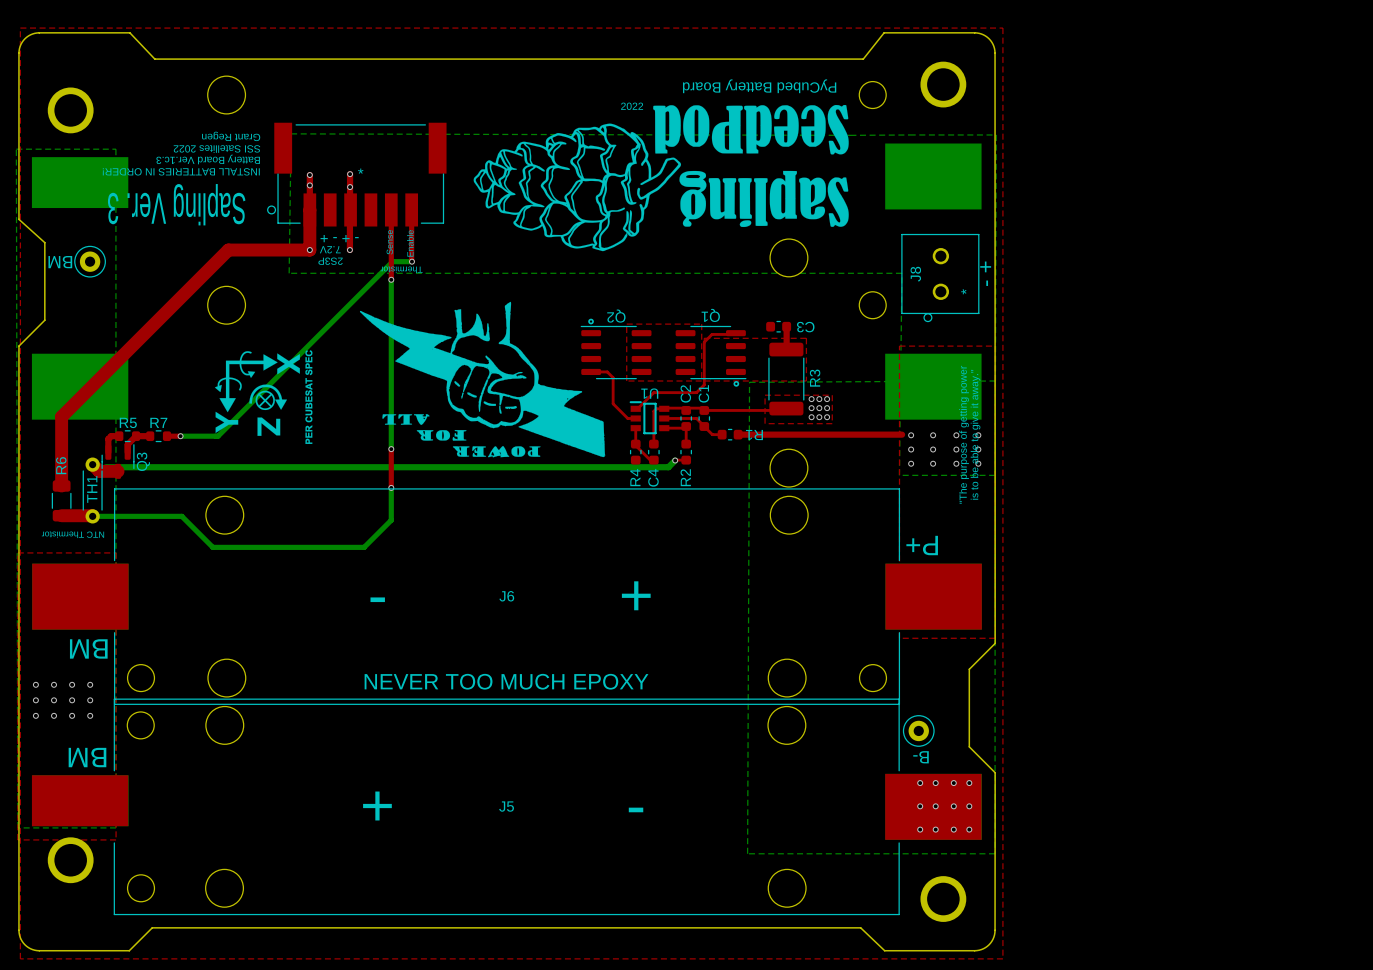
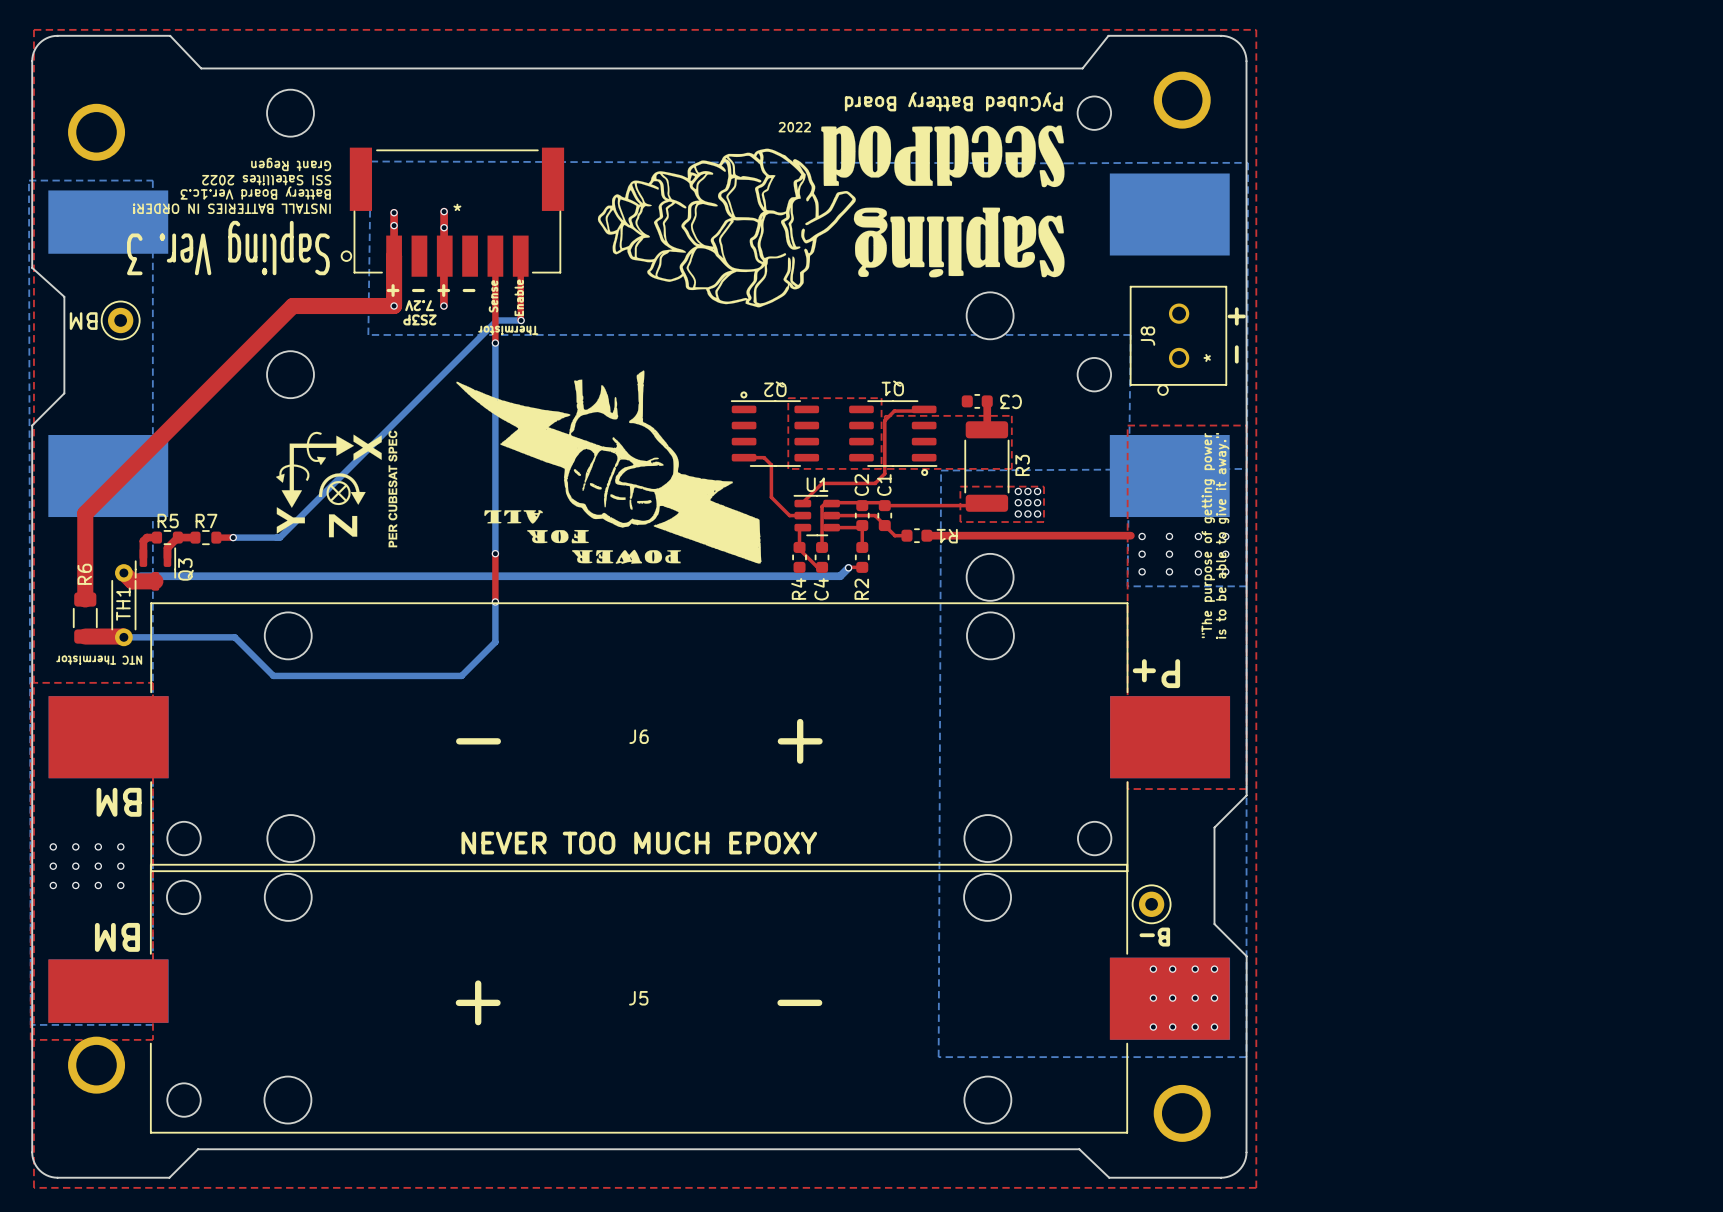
U1 footprint: [629, 401, 670, 435] -> [793, 495, 841, 537]

